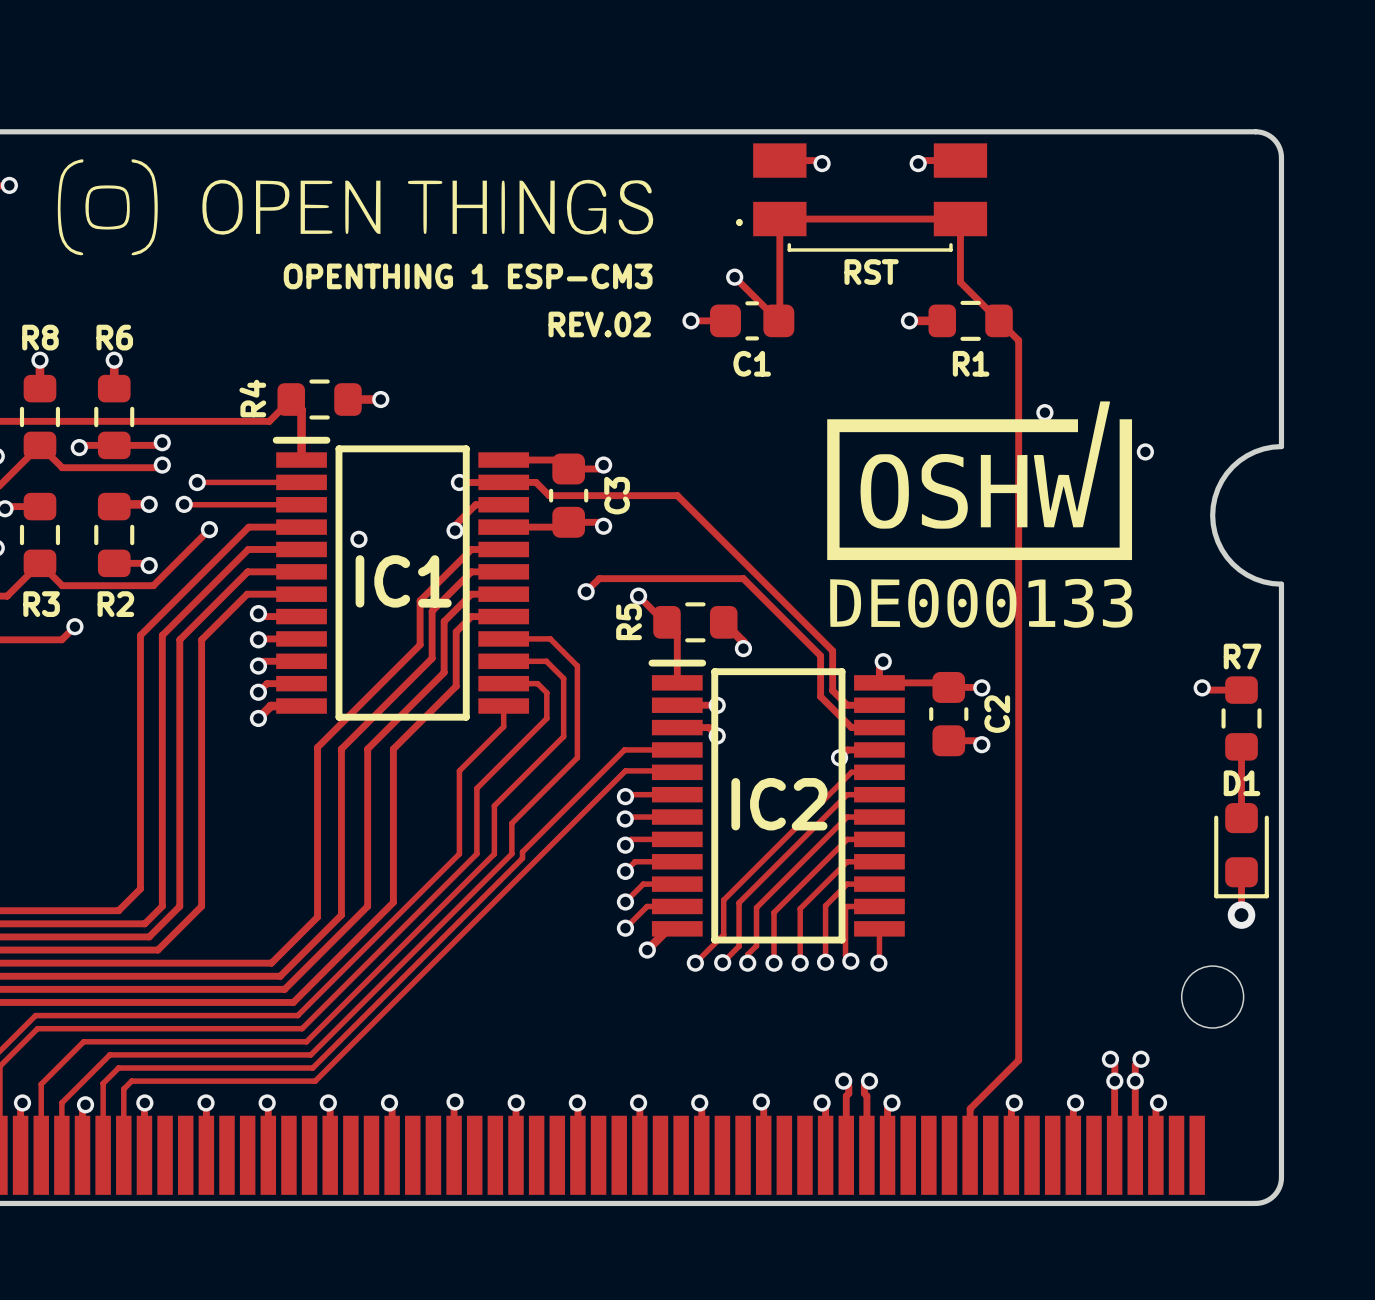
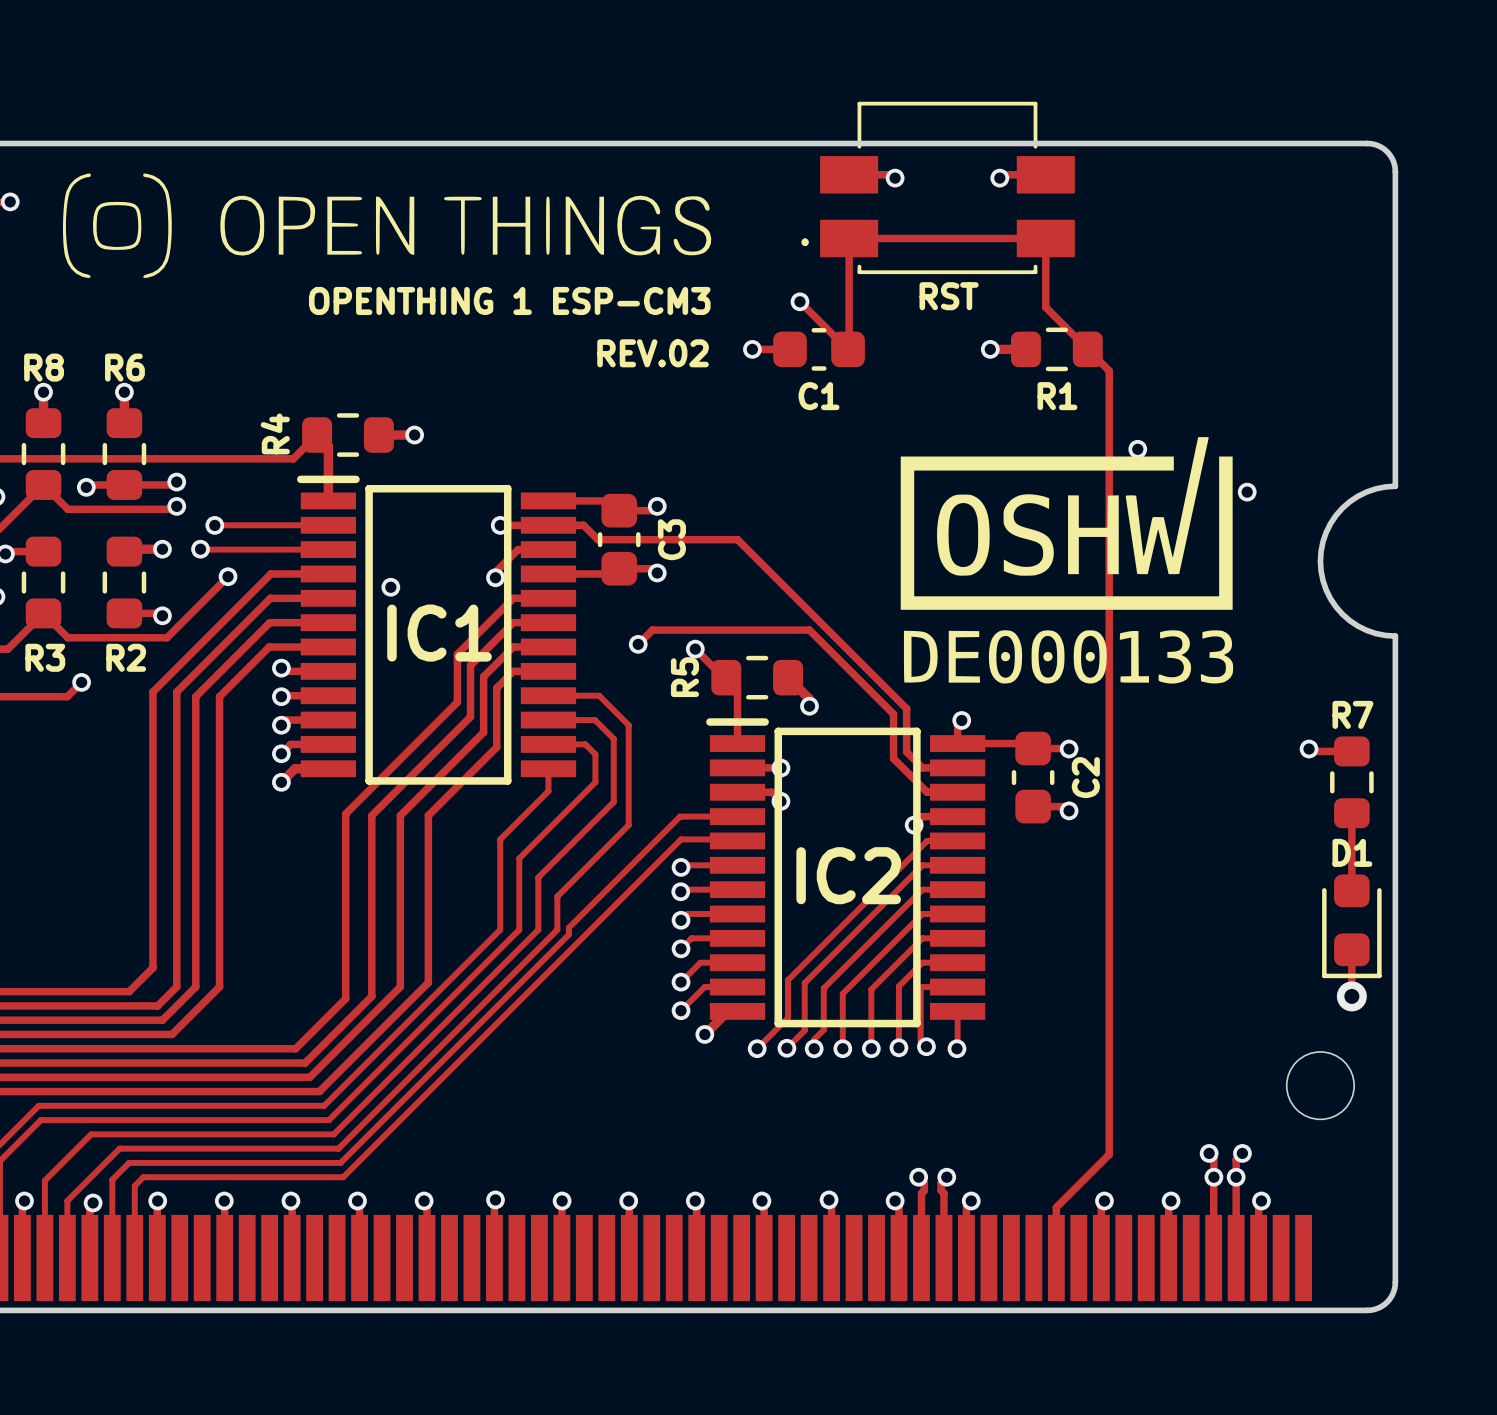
part footprint: [735, 143, 988, 252] -> [801, 101, 1075, 275]

